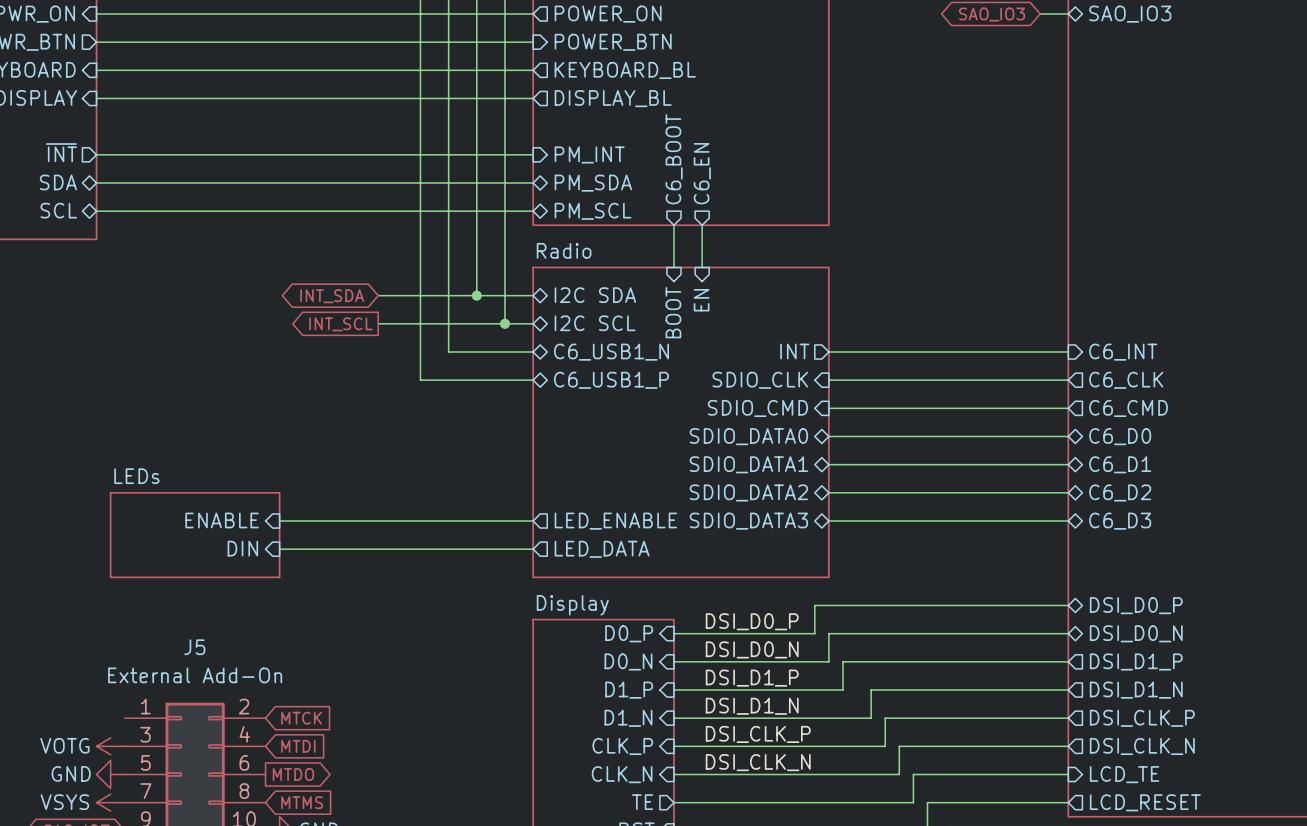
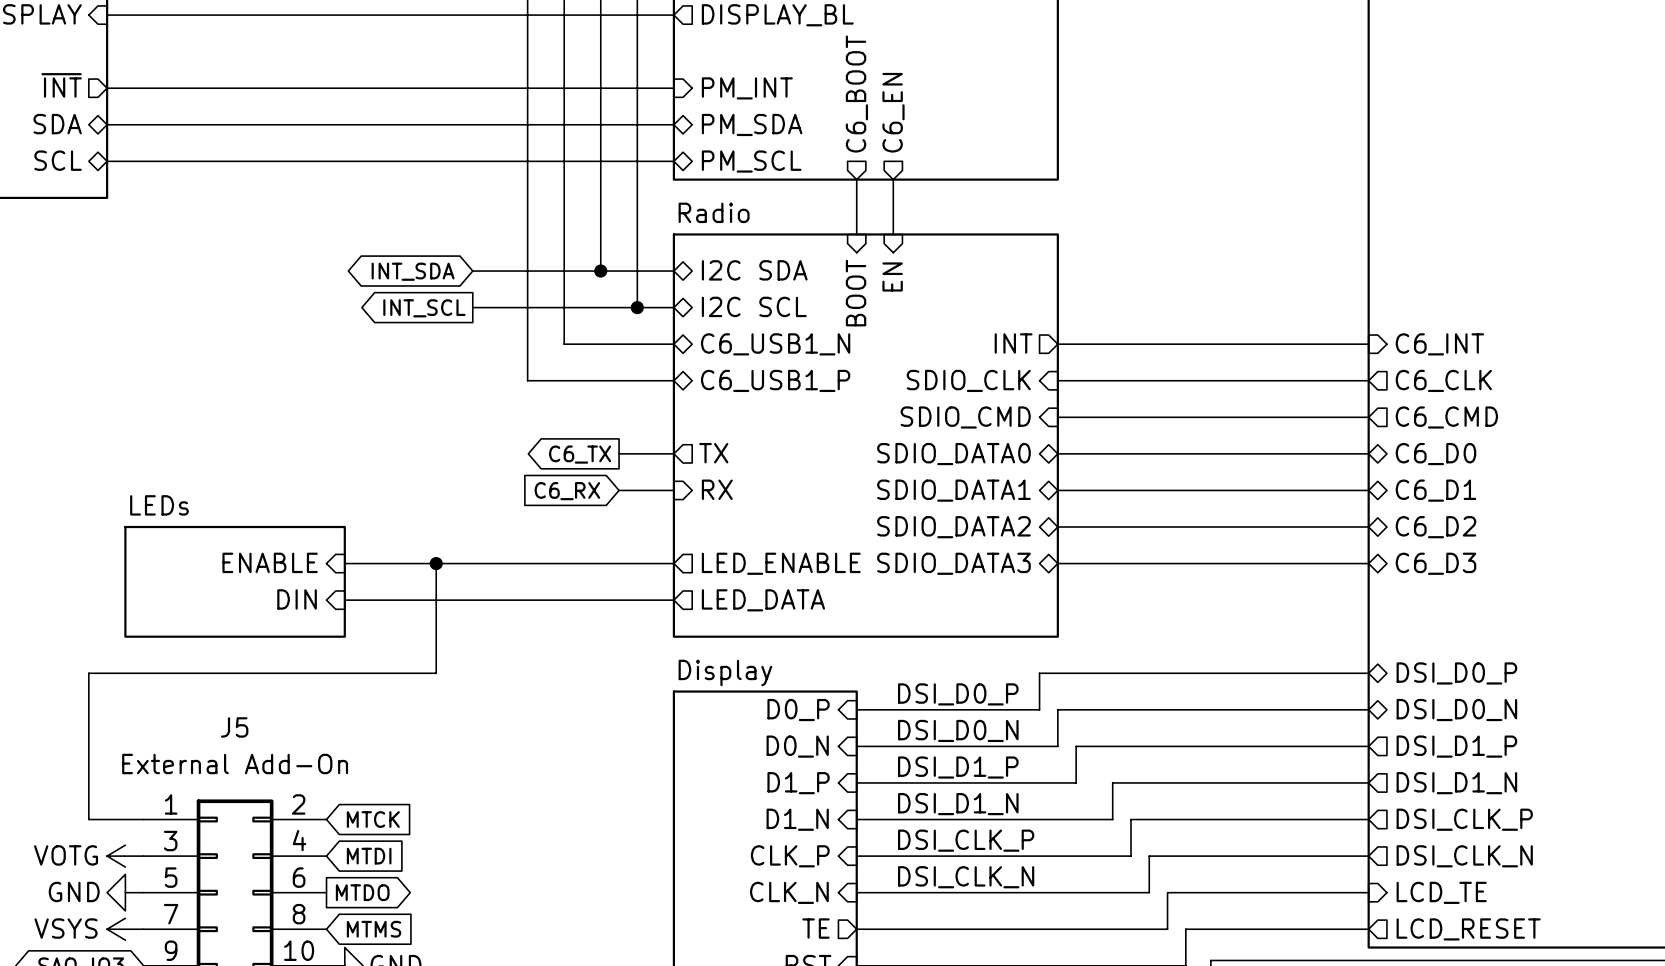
sheet pin: none -> TX (713, 453)
wire: none -> (619, 453) (673, 453)
global label: none -> C6_TX (580, 454)
wire: none -> (619, 490) (673, 490)
sheet pin: none -> RX (717, 489)
global label: none -> C6_RX (567, 491)
wire: none -> (436, 563) (436, 673) (88, 673) (88, 819) (143, 819)
junction: none -> (436, 563)

